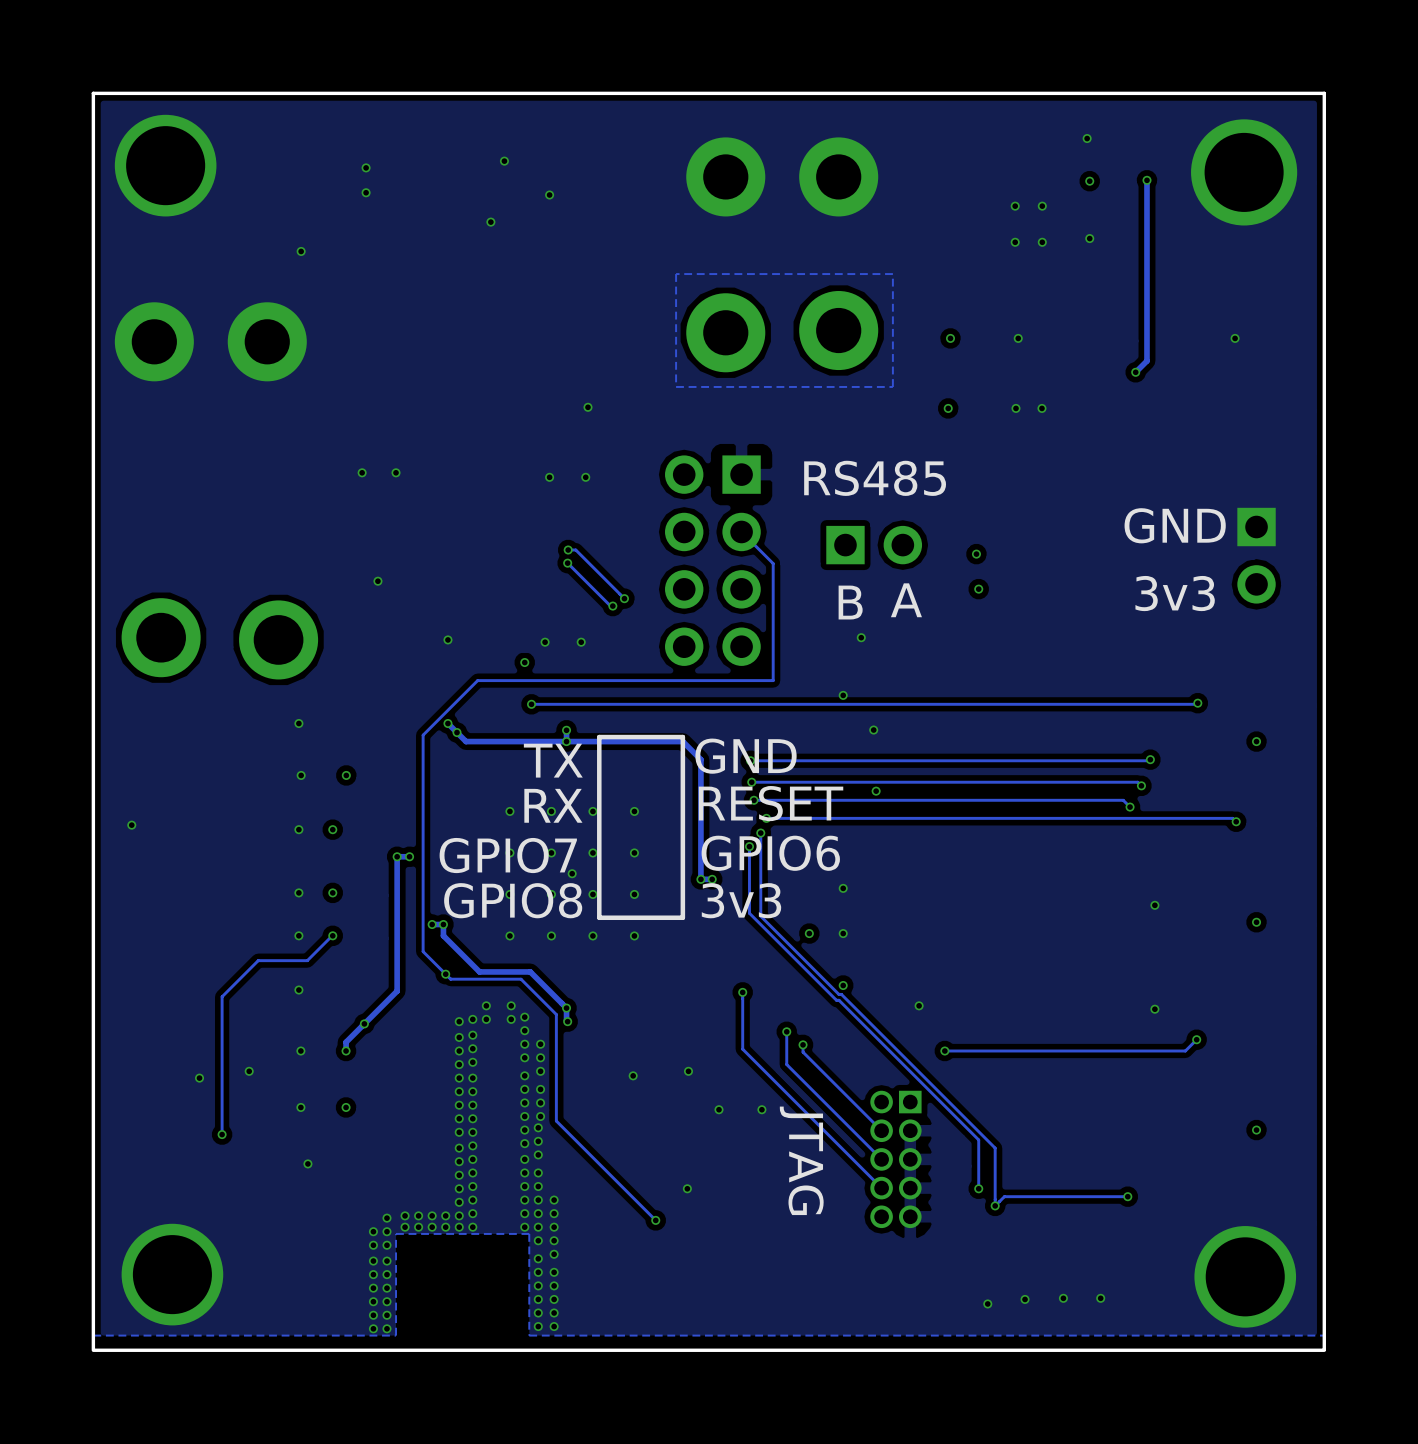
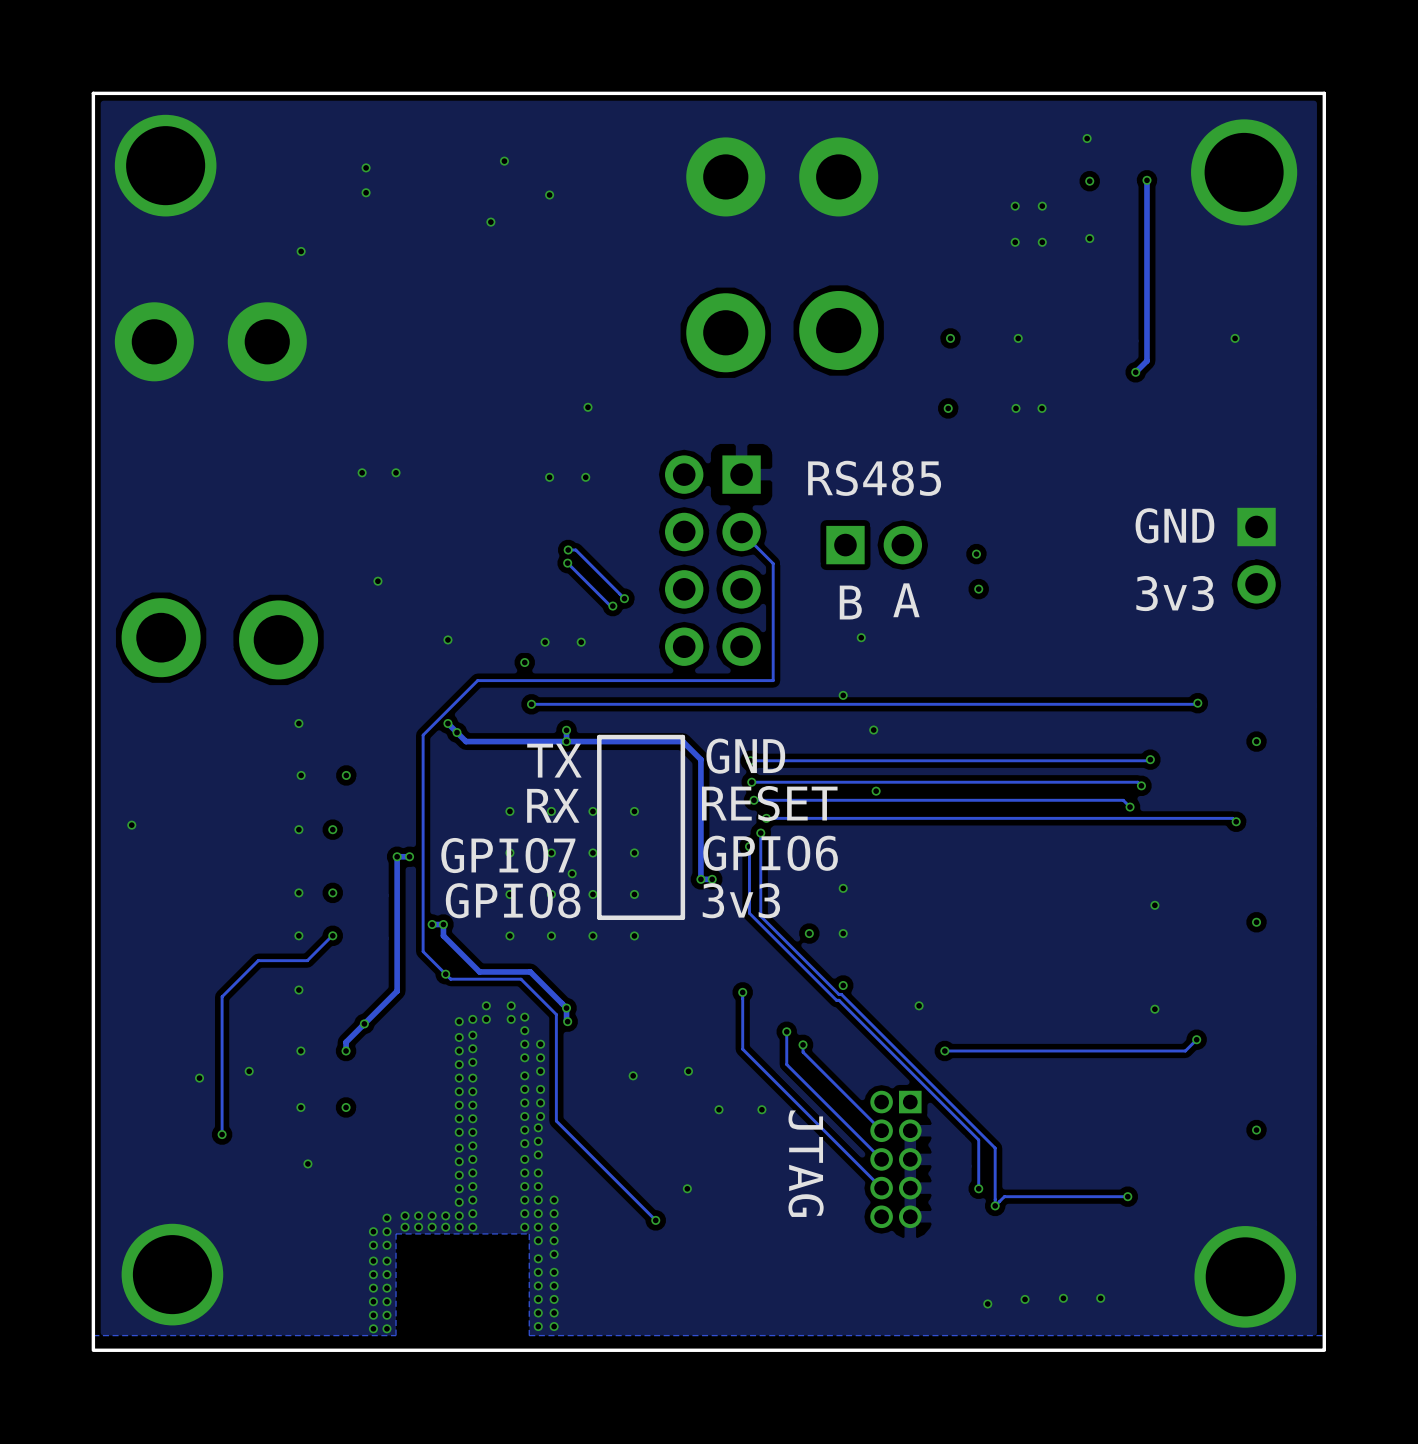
zone outline: (892, 274) (676, 274) (676, 386) (892, 386) (892, 274) -> none

